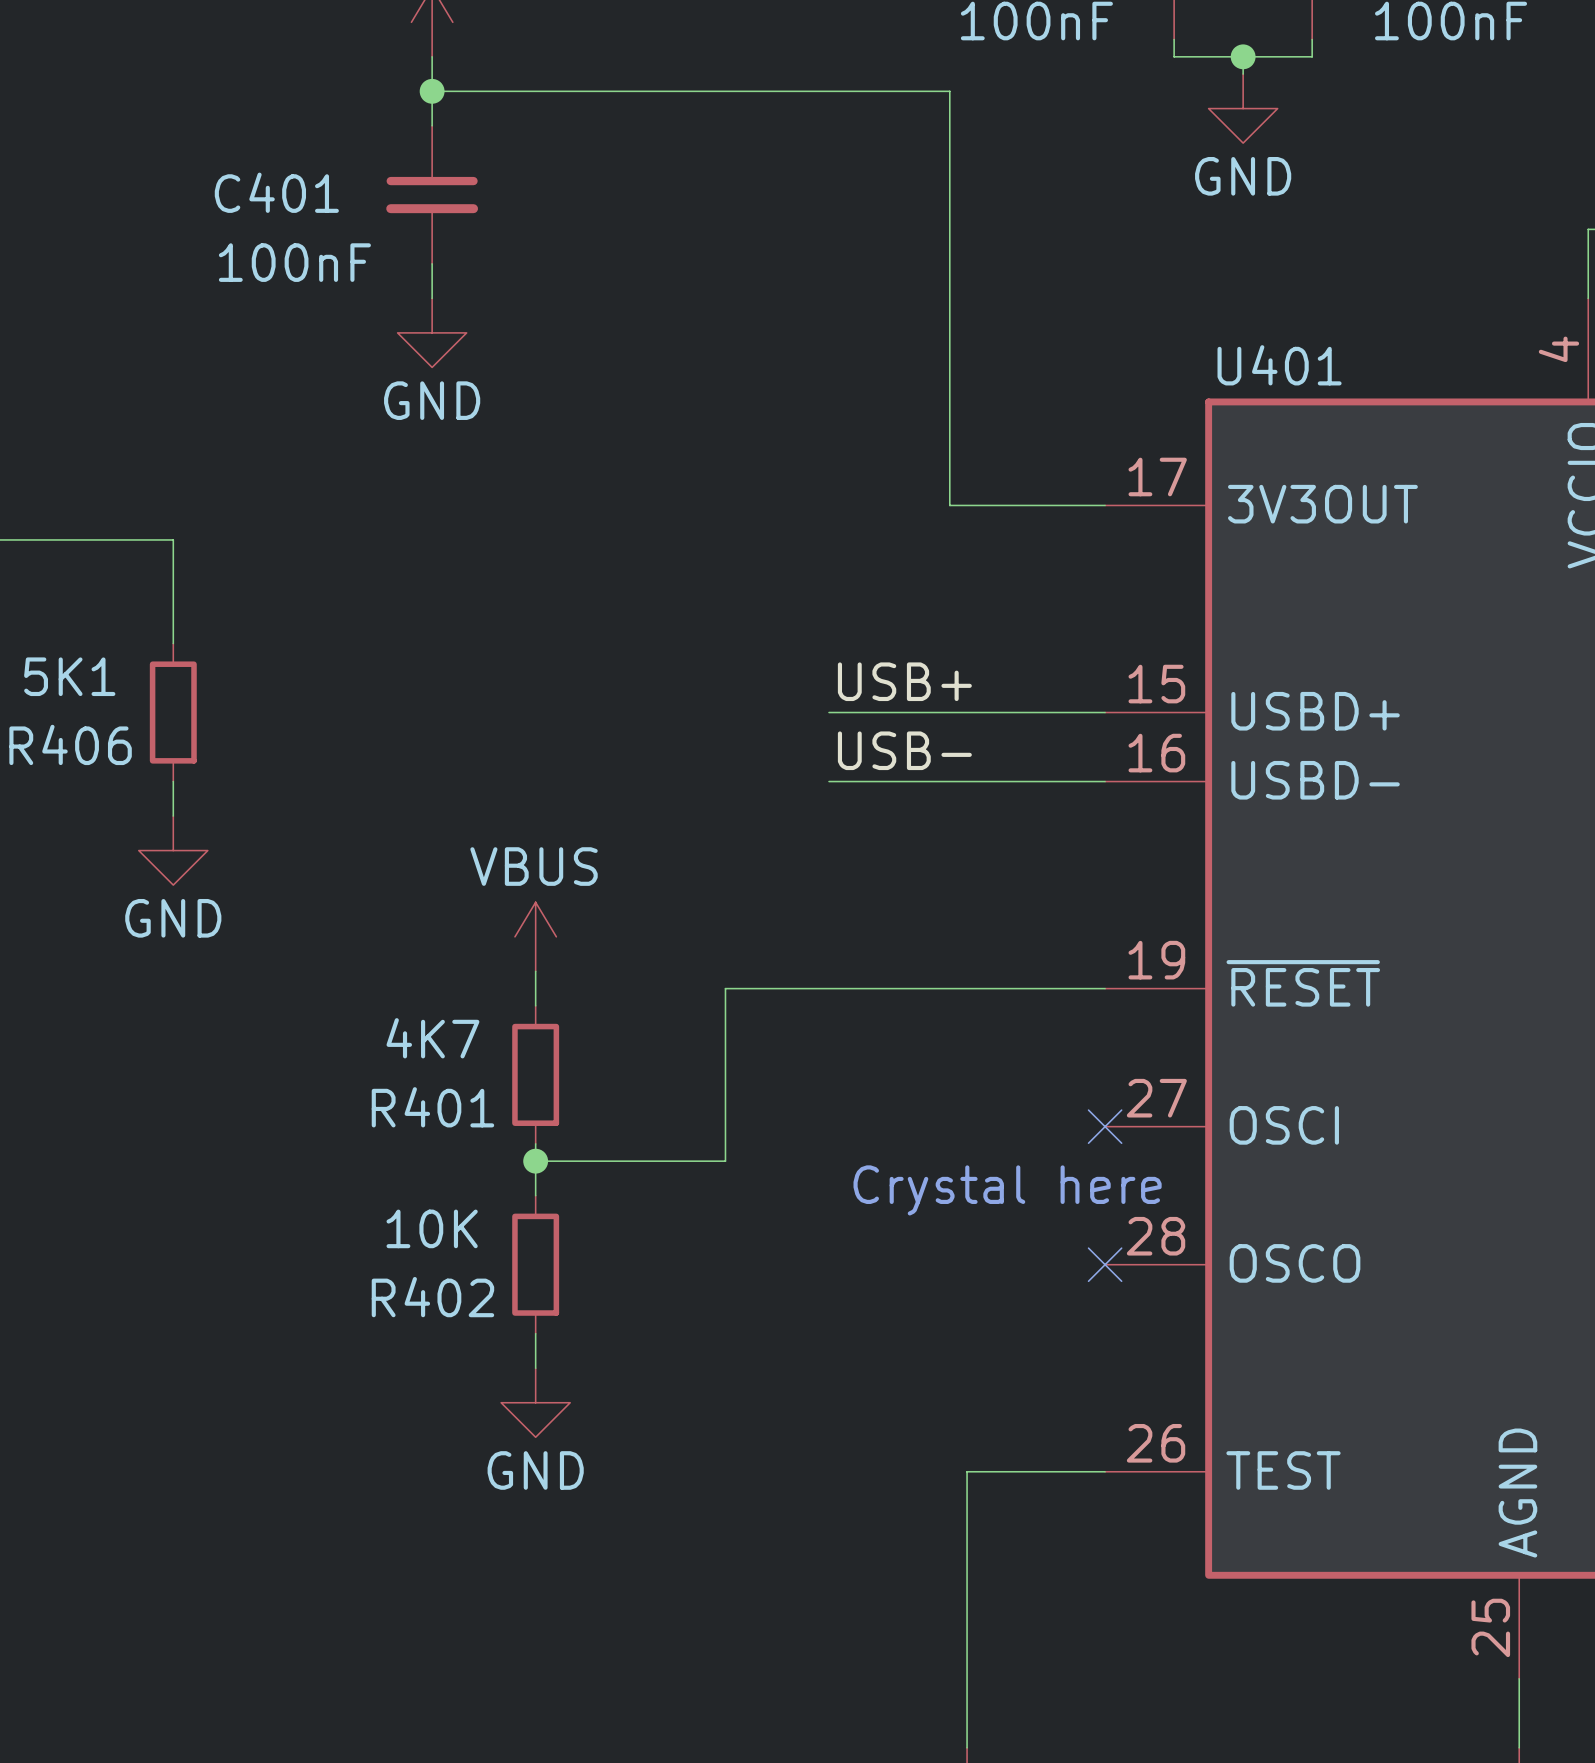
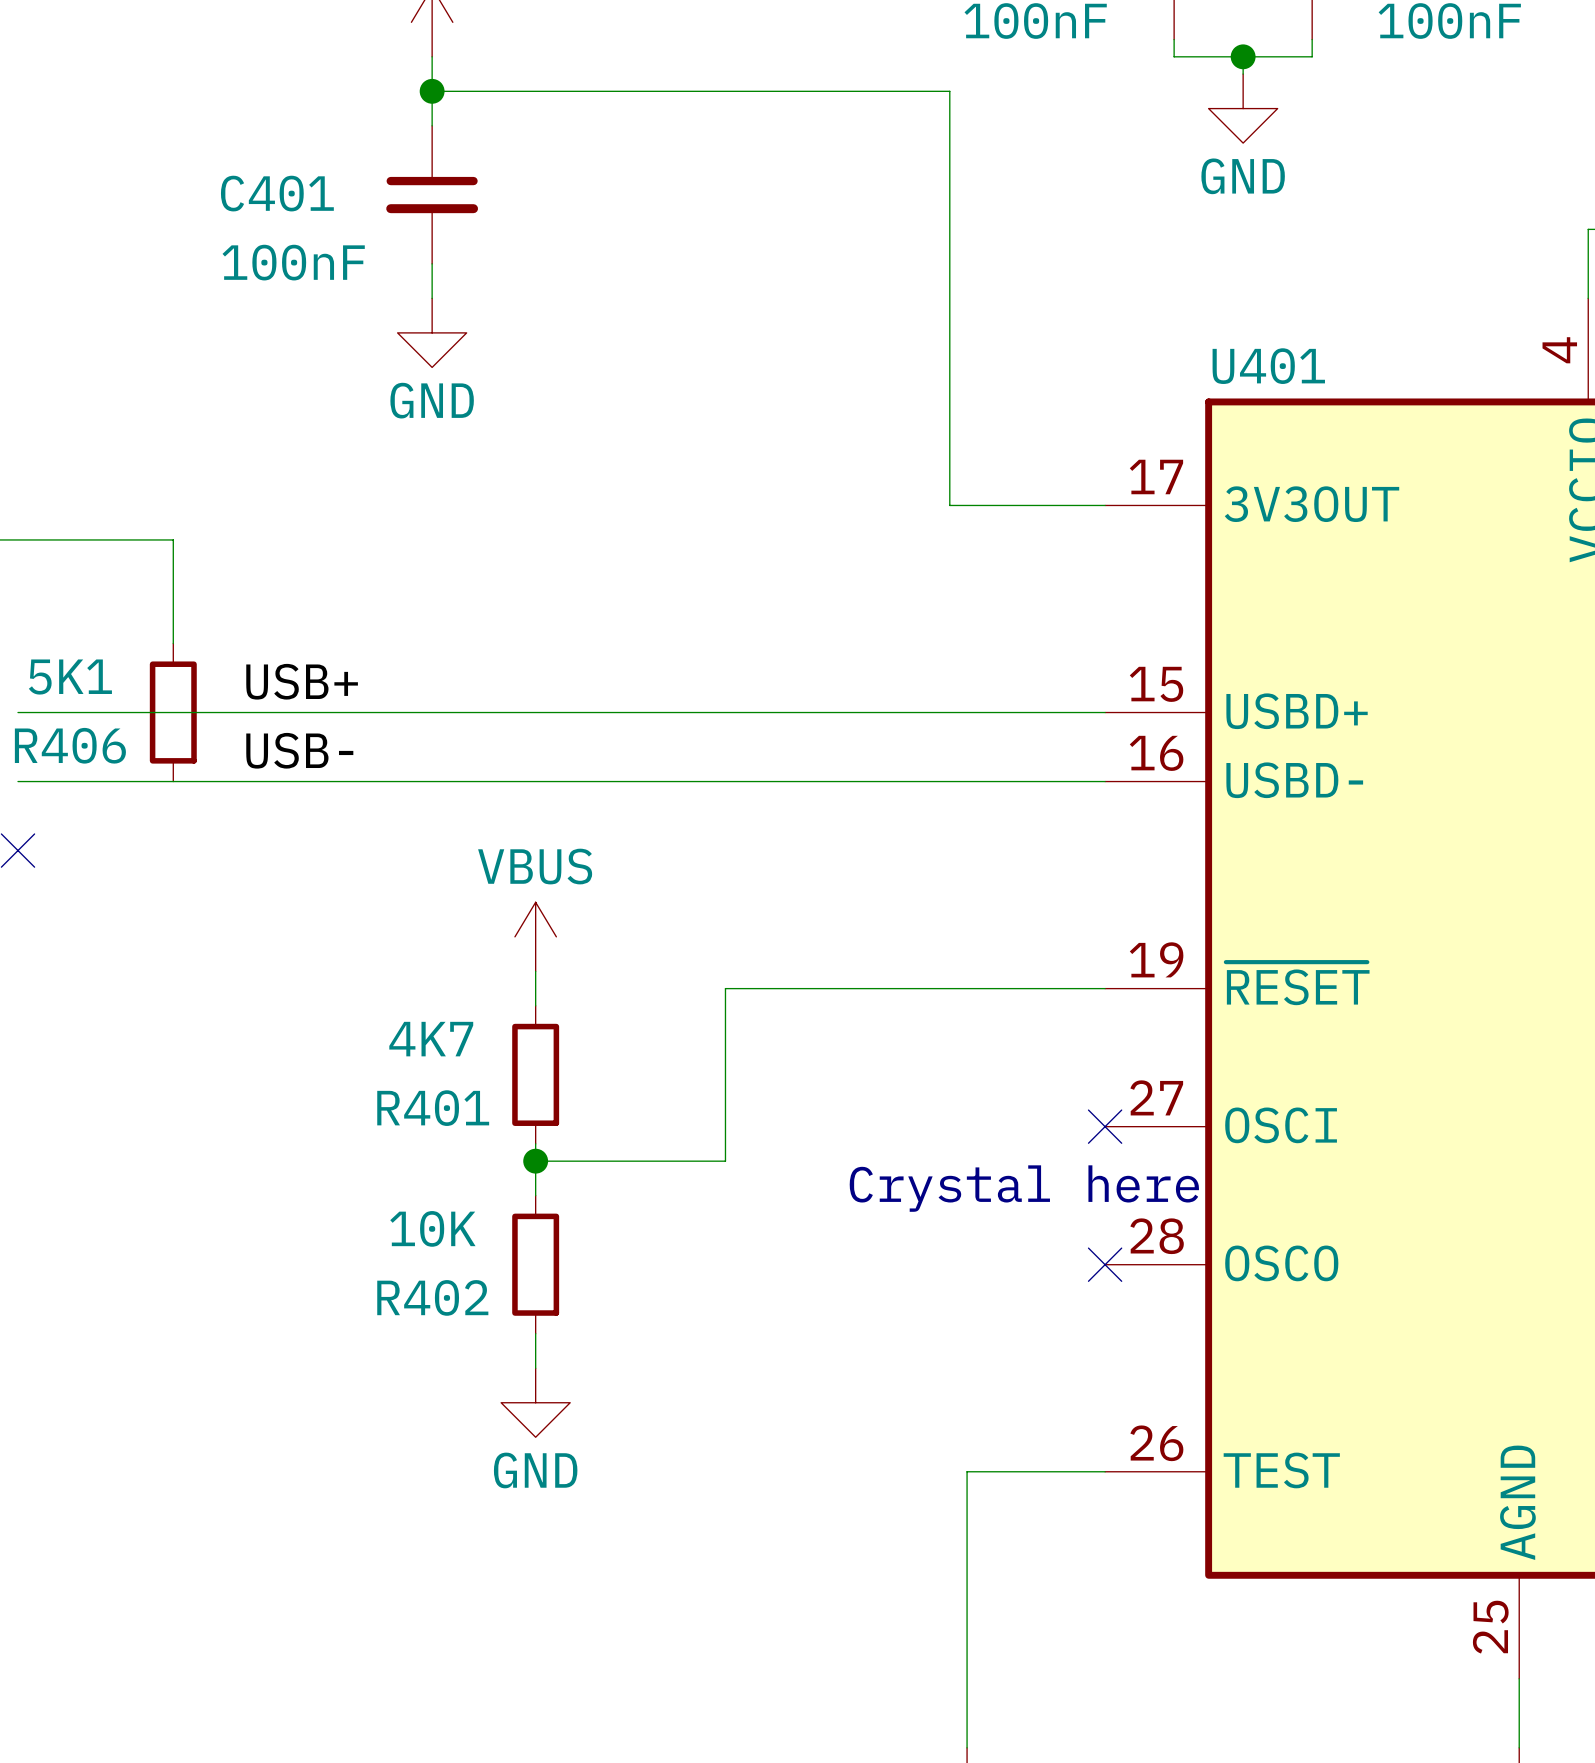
label: none -> USB+ (302, 681)
label: USB+ (904, 681) -> none
wire: none -> (18, 712) (829, 712)
label: none -> USB- (299, 750)
label: USB- (904, 750) -> none
wire: none -> (18, 781) (829, 781)
wire: (173, 781) (173, 816) -> none
no-connect mark: none -> (18, 850)
power symbol: GND (173, 850) -> none

